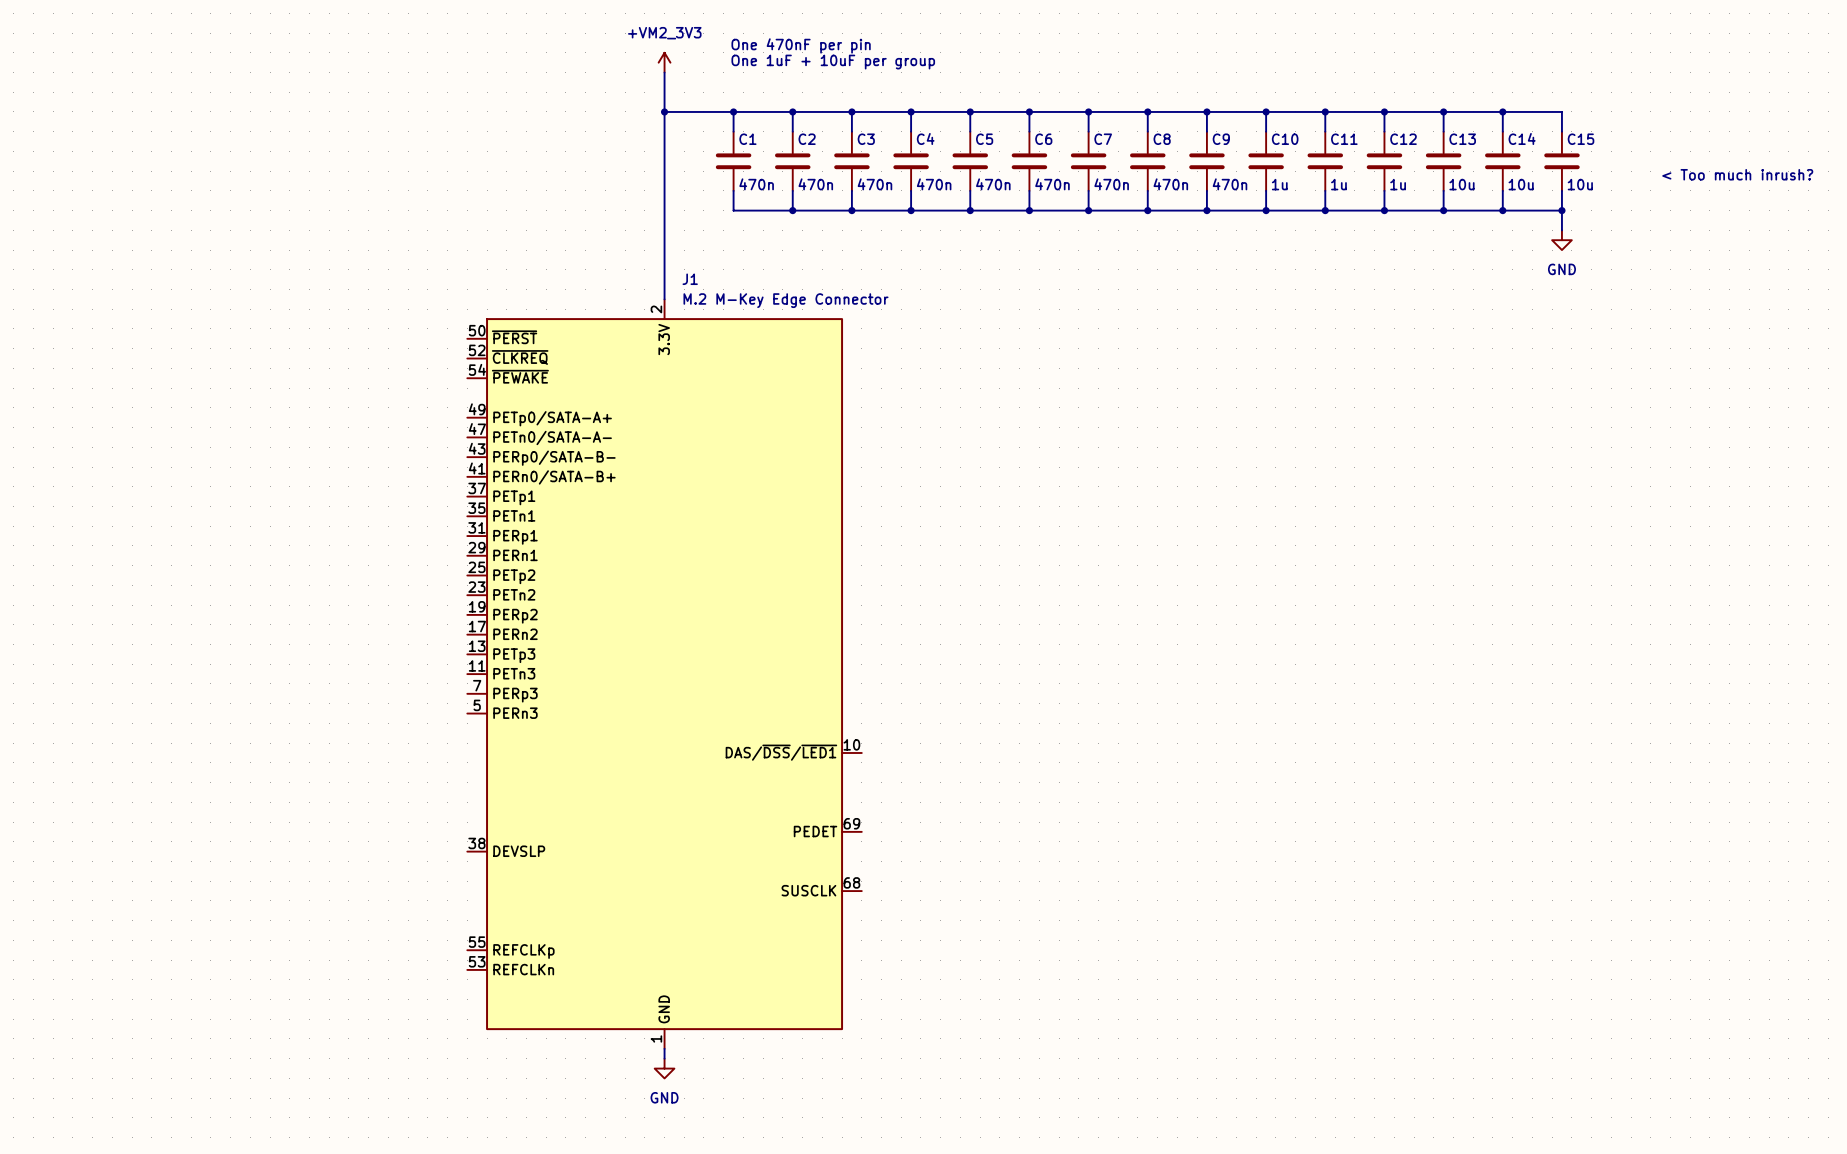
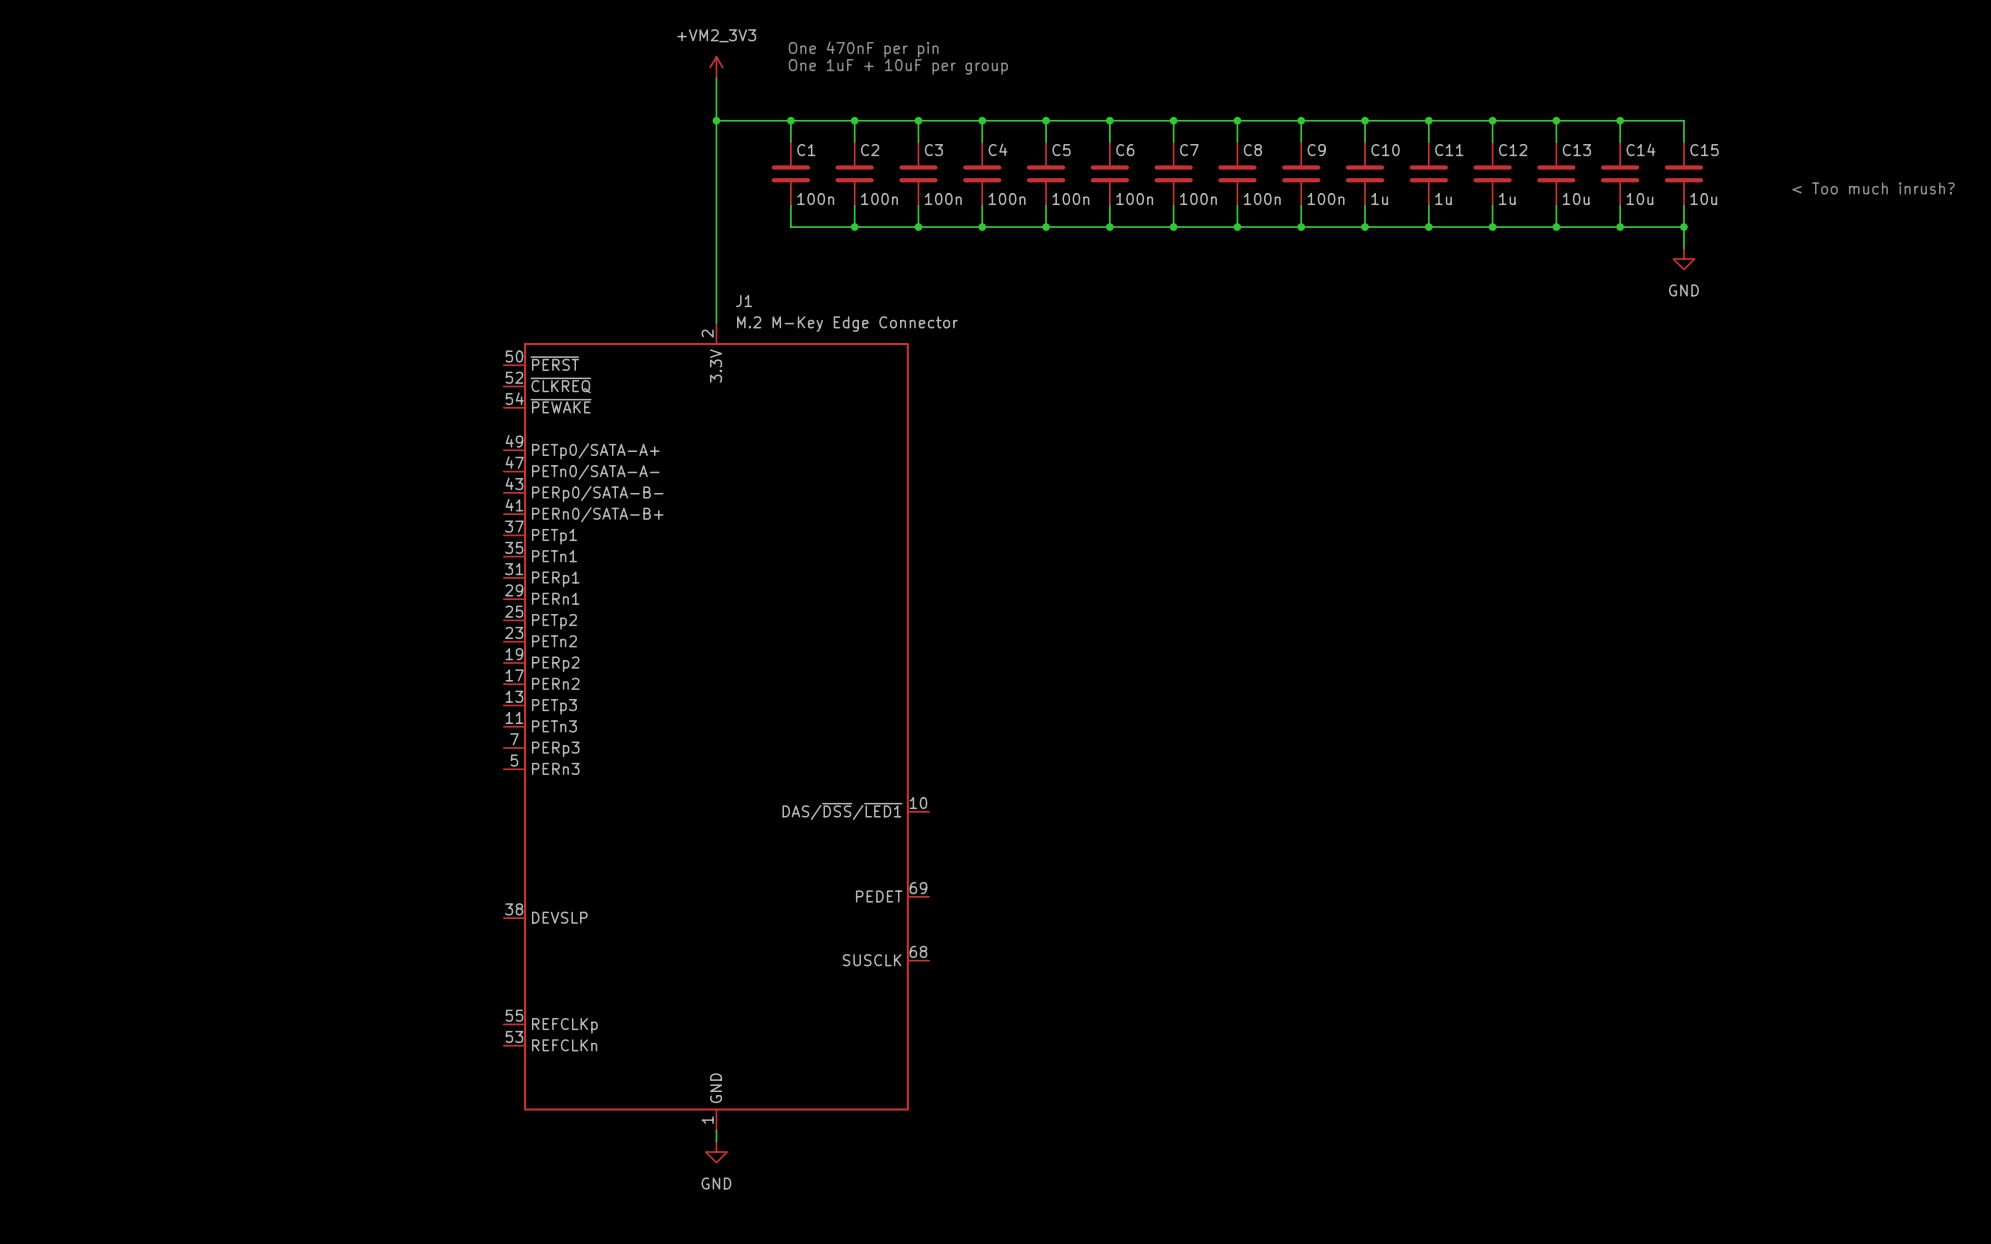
C1 value: 470n (756, 184) -> 100n (815, 199)
C2 value: 470n (815, 184) -> 100n (879, 199)
C3 value: 470n (874, 184) -> 100n (943, 199)
C4 value: 470n (934, 184) -> 100n (1007, 199)
C5 value: 470n (993, 184) -> 100n (1070, 199)
C6 value: 470n (1052, 184) -> 100n (1134, 199)
C7 value: 470n (1111, 184) -> 100n (1198, 199)
C8 value: 470n (1170, 184) -> 100n (1262, 199)
C9 value: 470n (1229, 184) -> 100n (1326, 199)

